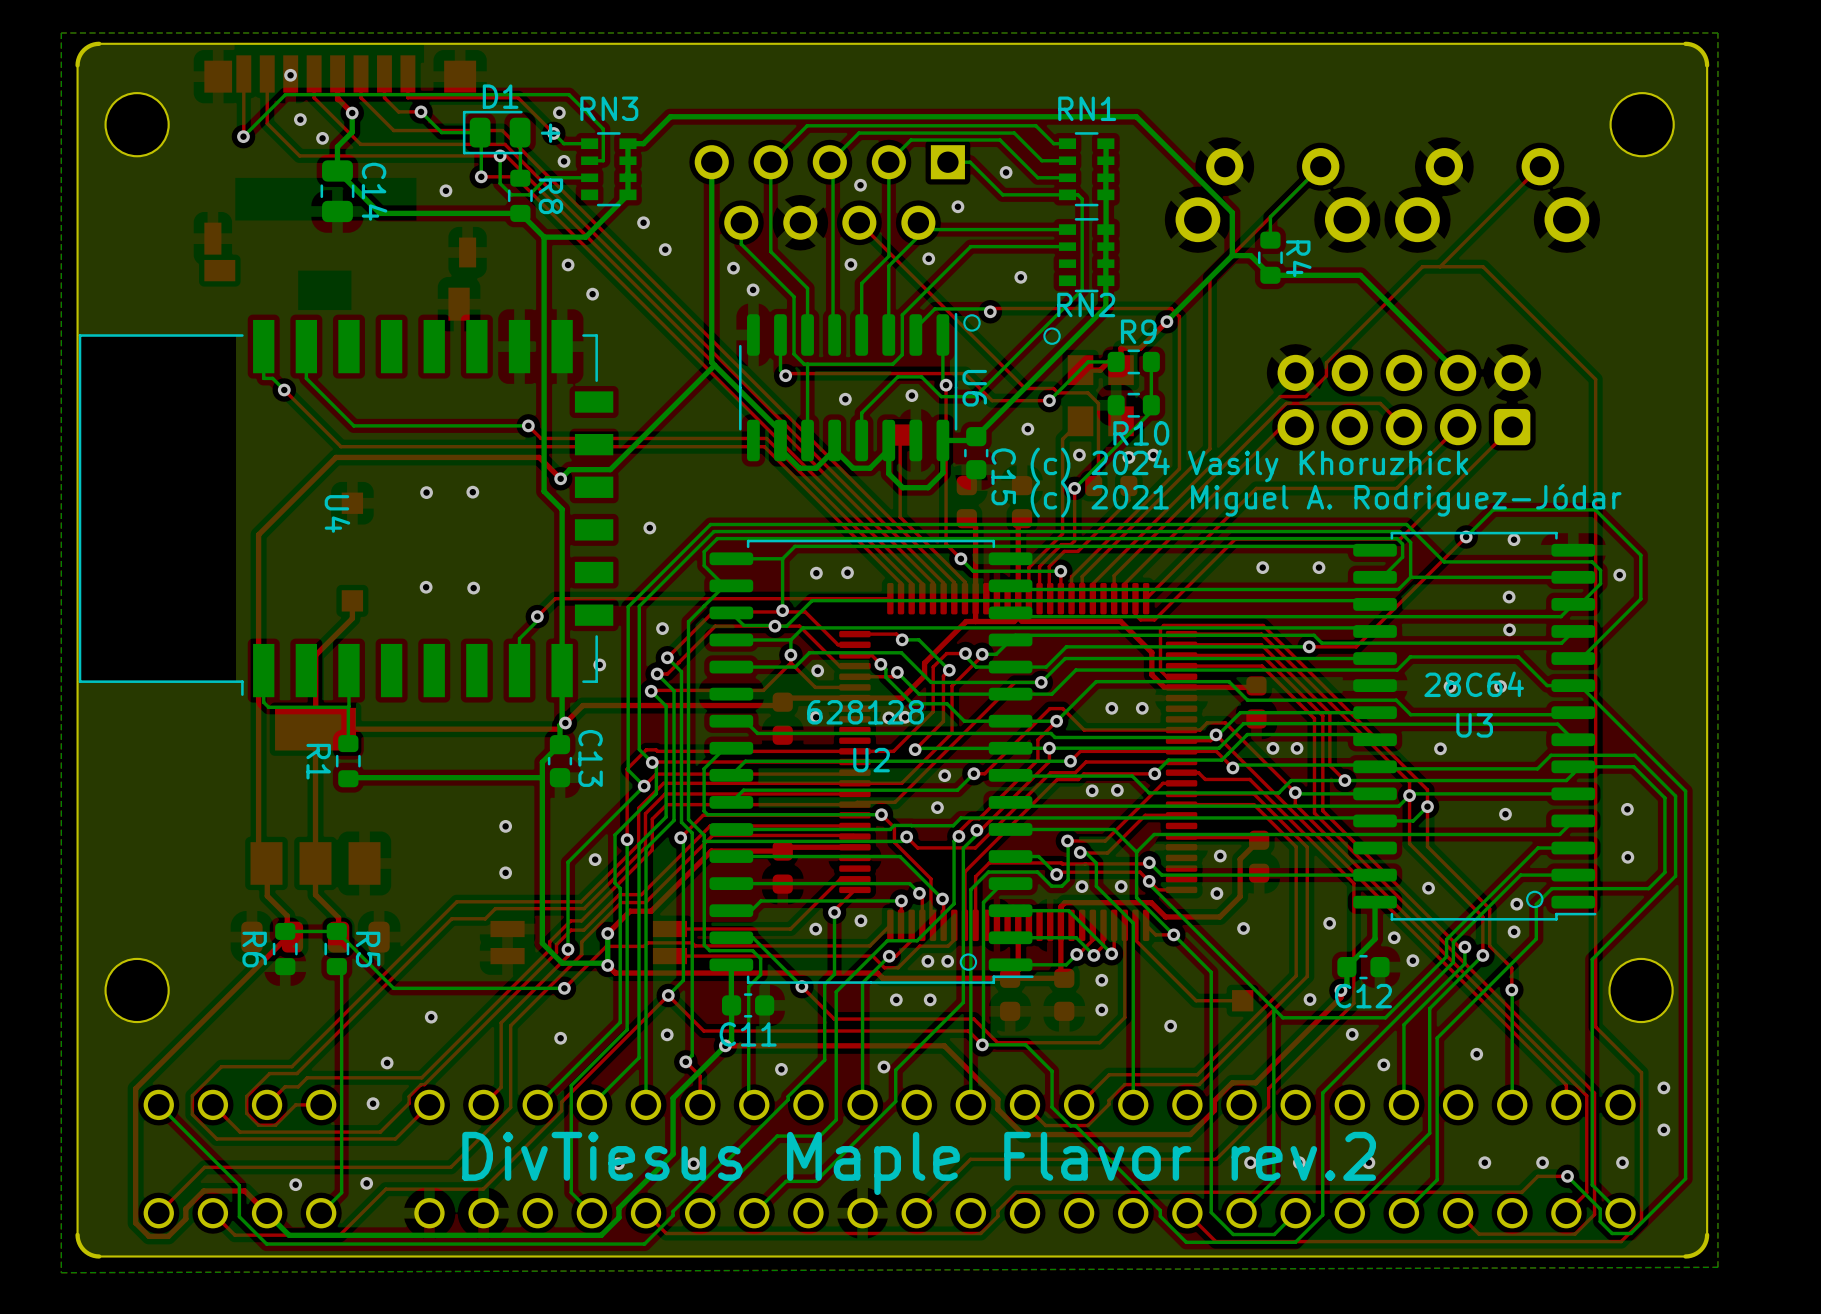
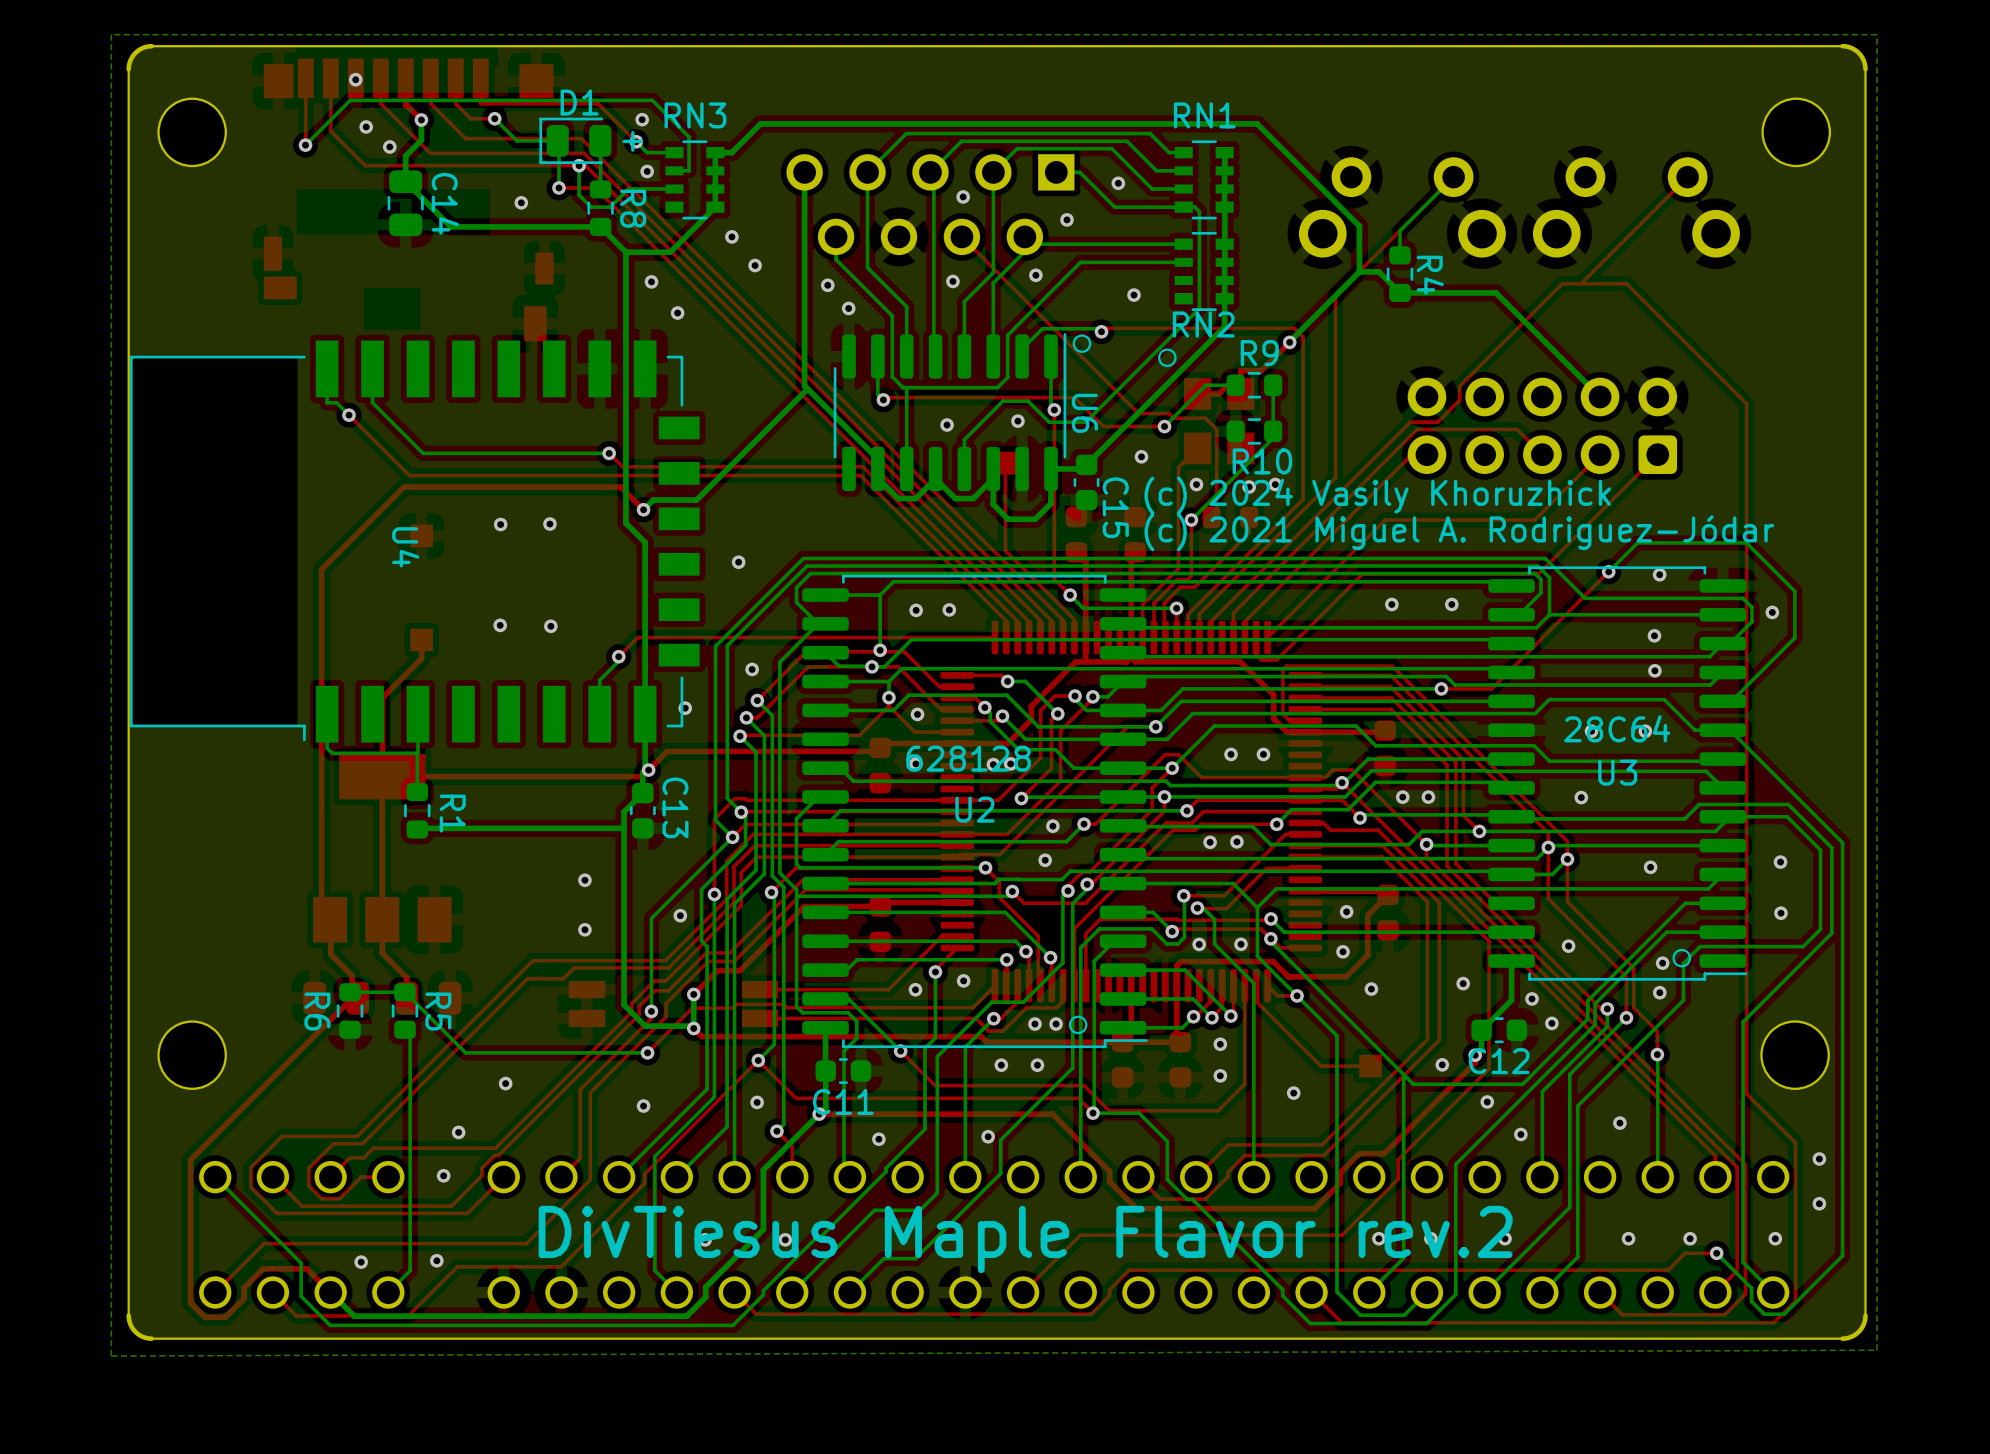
R1 name position: R1 (318, 761) -> R1 (452, 813)

